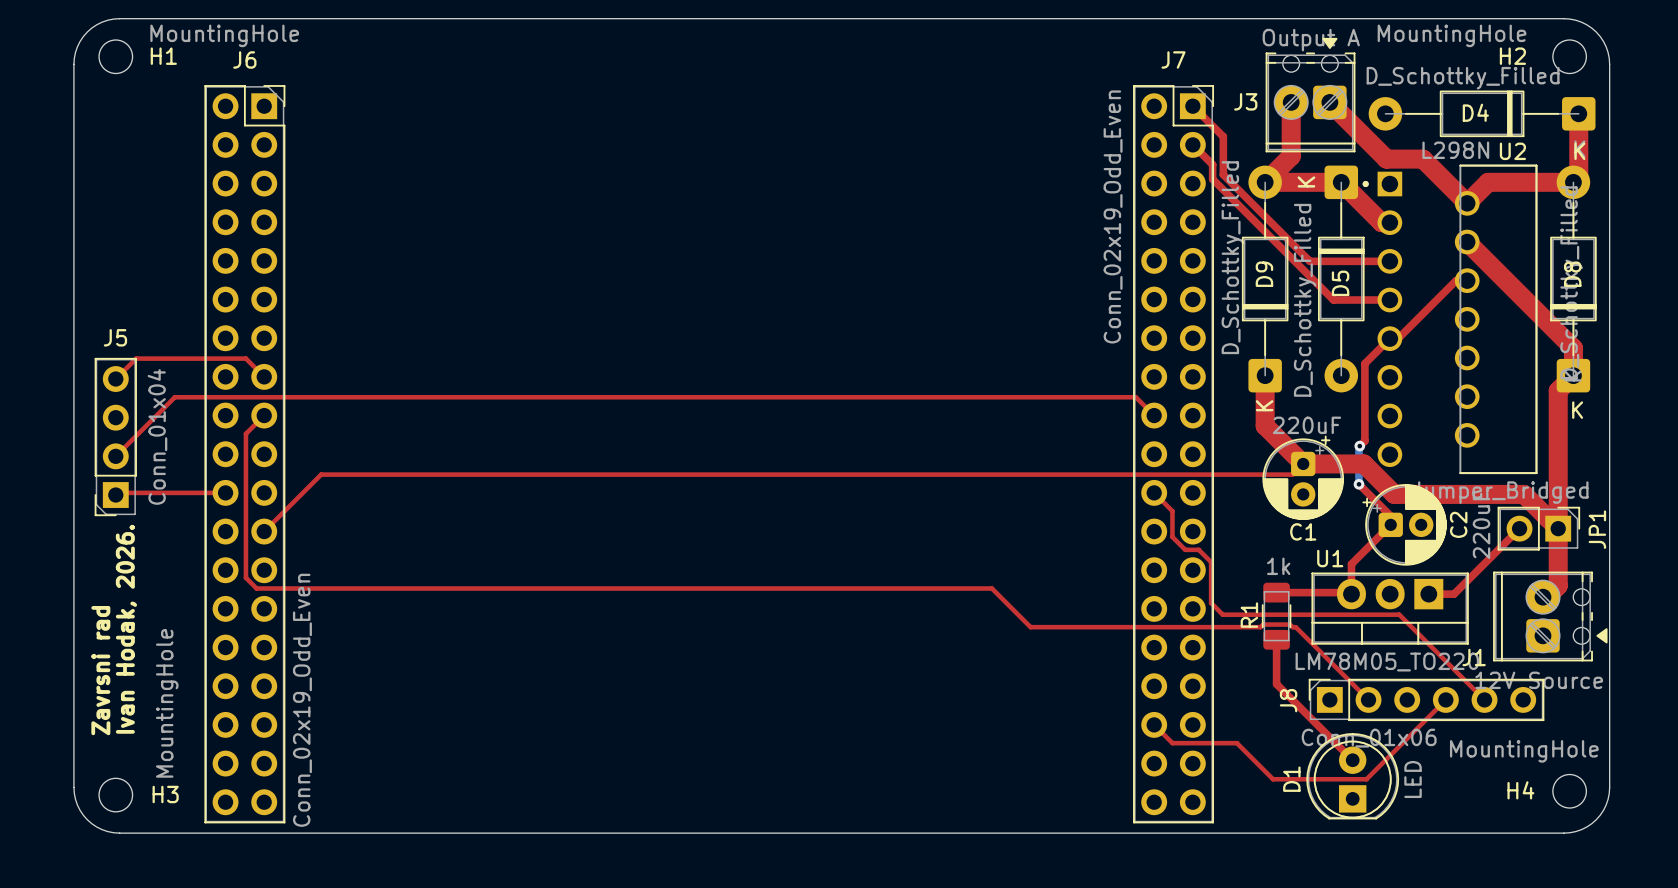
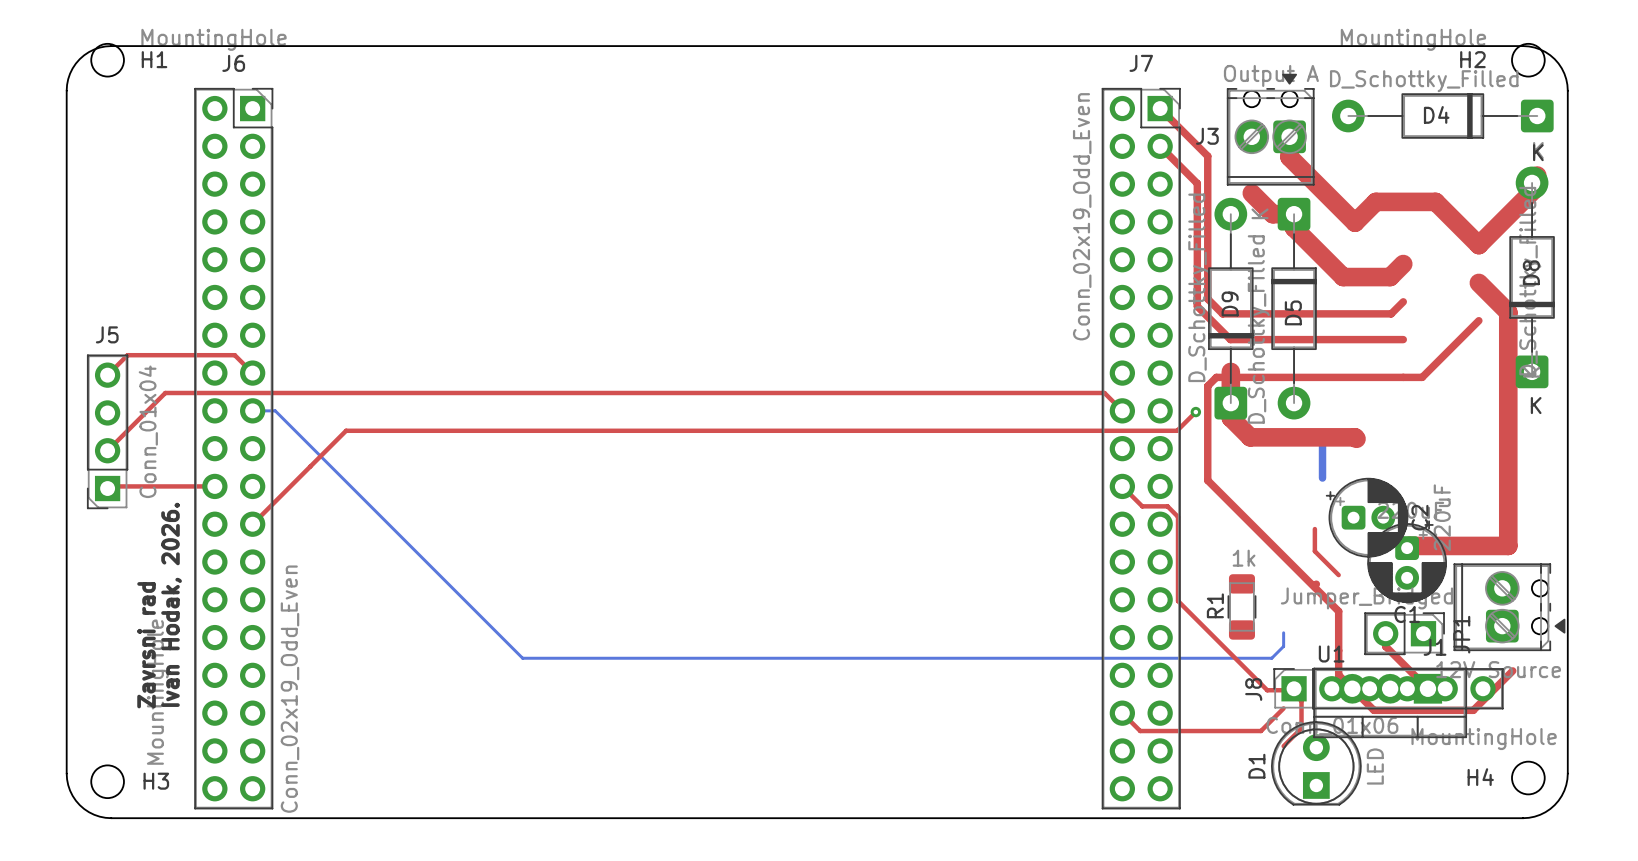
board edge: (73, 87) (74, 58) (80, 41) (87, 32) (96, 24) (107, 20) (119, 18) (1563, 18) (1581, 22) (1596, 32) (1606, 46) (1609, 64) (1609, 787) (1608, 799) (1603, 810) (1591, 823) (1581, 829) (1563, 833) (119, 833) (102, 829) (87, 819) (77, 804) (73, 786) -> (66, 90) (70, 73) (79, 59) (94, 49) (111, 46) (1523, 46) (1540, 49) (1554, 59) (1564, 73) (1567, 90) (1567, 773) (1566, 785) (1558, 800) (1550, 808) (1540, 814) (1523, 818) (111, 818) (94, 814) (79, 805) (70, 790) (66, 773)
J3 position: (1310, 95) -> (1270, 129)
top track: (1291, 102) (1291, 156) (1265, 182) (1341, 182) (1381, 222) (1389, 222) -> none
top track: (1329, 102) (1386, 159) (1422, 159) (1467, 203) (1488, 182) (1573, 182) (1578, 177) -> (1289, 136) (1289, 157) (1355, 222) (1375, 201) (1435, 201) (1478, 245) (1537, 186) (1537, 177)
top track: (1578, 113) (1578, 174) -> none
top track: (1223, 136) (1223, 174) (1309, 261) (1389, 261) -> (1189, 138) (1207, 156) (1207, 298) (1222, 313) (1391, 313) (1403, 301)
top track: (1212, 164) (1212, 179) (1333, 300) (1389, 300) -> (1179, 165) (1197, 183) (1197, 306) (1230, 339) (1403, 339)
D9 footprint: [1241, 165, 1289, 393] -> [1208, 197, 1254, 420]
top track: none -> (1251, 193) (1272, 214) (1294, 214) (1294, 227) (1343, 277) (1390, 277) (1403, 264)
top track: (1467, 242) (1573, 348) (1573, 375) (1558, 390) (1558, 585) (1542, 600) -> none
D5 position: (1341, 279) -> (1294, 308)
top track: (1467, 280) (1456, 280) (1398, 338) (1389, 338) (1364, 363) (1364, 440) (1359, 446) -> none
top track: none -> (1478, 282) (1508, 312) (1508, 545) (1409, 545) (1407, 548)
U2: L298N (1450, 319) -> none
top track: none -> (1478, 320) (1422, 377) (1216, 377) (1207, 386) (1207, 480) (1338, 611) (1338, 675) (1373, 710) (1473, 710) (1512, 670)
top track: (264, 415) (245, 433) (245, 577) (256, 588) (991, 588) (1030, 627) (1260, 627) (1263, 624) (1289, 624) (1295, 627) (1368, 699) -> none
bottom track: none -> (252, 410) (275, 410) (522, 658) (1271, 658) (1283, 646) (1283, 632)
via: none -> (1195, 412)
top track: (1265, 422) (1265, 425) (1303, 463) -> (1230, 417) (1250, 437) (1356, 438)
via: (1359, 446) -> none
top track: (1303, 463) (1292, 474) (321, 474) -> (1195, 412) (1177, 430) (346, 430) (308, 468)
top track: (1303, 463) (1363, 463) (1394, 494) (1523, 494) (1558, 528) -> none
C1 position: (1303, 477) -> (1407, 561)
top track: (1358, 484) (1390, 516) (1390, 524) (1351, 564) (1351, 594) (1276, 592) (1278, 594) -> none
via: (1358, 484) -> none
top track: (1172, 511) (1172, 537) (1185, 549) (1198, 549) (1211, 562) -> (1140, 504) (1142, 506) (1167, 506) (1178, 516) (1178, 554)
top track: (1519, 528) (1454, 594) (1428, 594) -> none
JP1 position: (1538, 528) -> (1404, 633)
top track: none -> (1314, 529) (1314, 551) (1338, 575)
top track: (1211, 603) (1222, 614) (1399, 614) (1484, 699) -> (1178, 594) (1178, 601) (1267, 690) (1290, 690) (1301, 701) (1301, 728) (1283, 746)
U1 position: (1390, 608) -> (1390, 702)
text position: Ivan Hodak, 2026. (126, 629) -> Ivan Hodak, 2026. (171, 604)
top track: (1276, 639) (1276, 684) (1352, 760) -> none
top track: none -> (1385, 633) (1385, 646) (1427, 688)
U1 value: LM78M05_TO220 (1387, 662) -> none
text position: Zavrsni rad (100, 670) -> Zavrsni rad (146, 645)
top track: (1445, 699) (1366, 779) (1273, 779) (1236, 743) -> (1283, 708) (1261, 731) (1203, 731)

